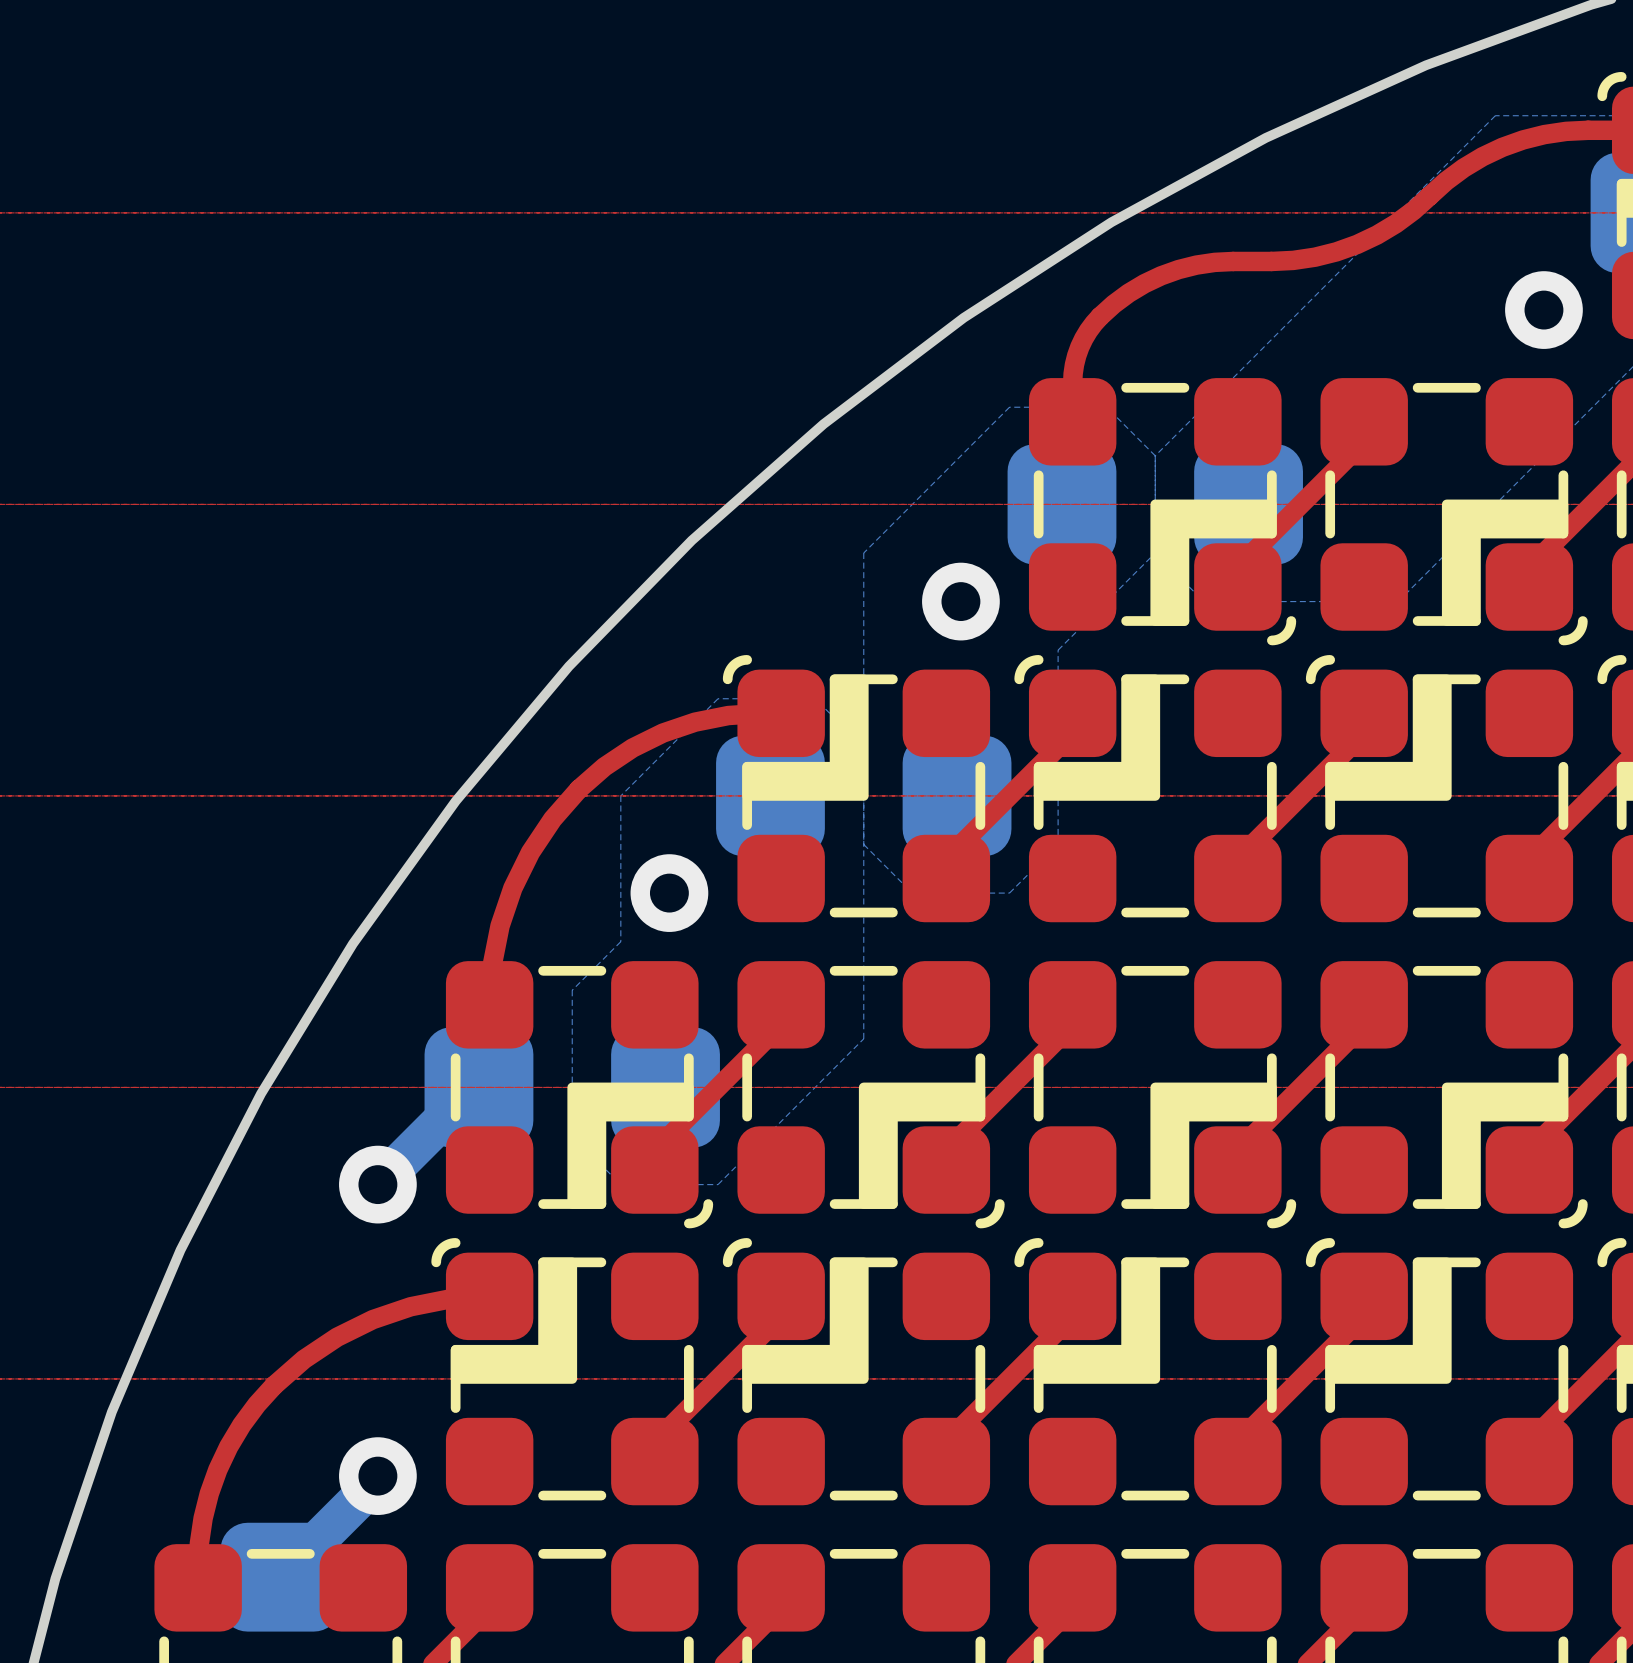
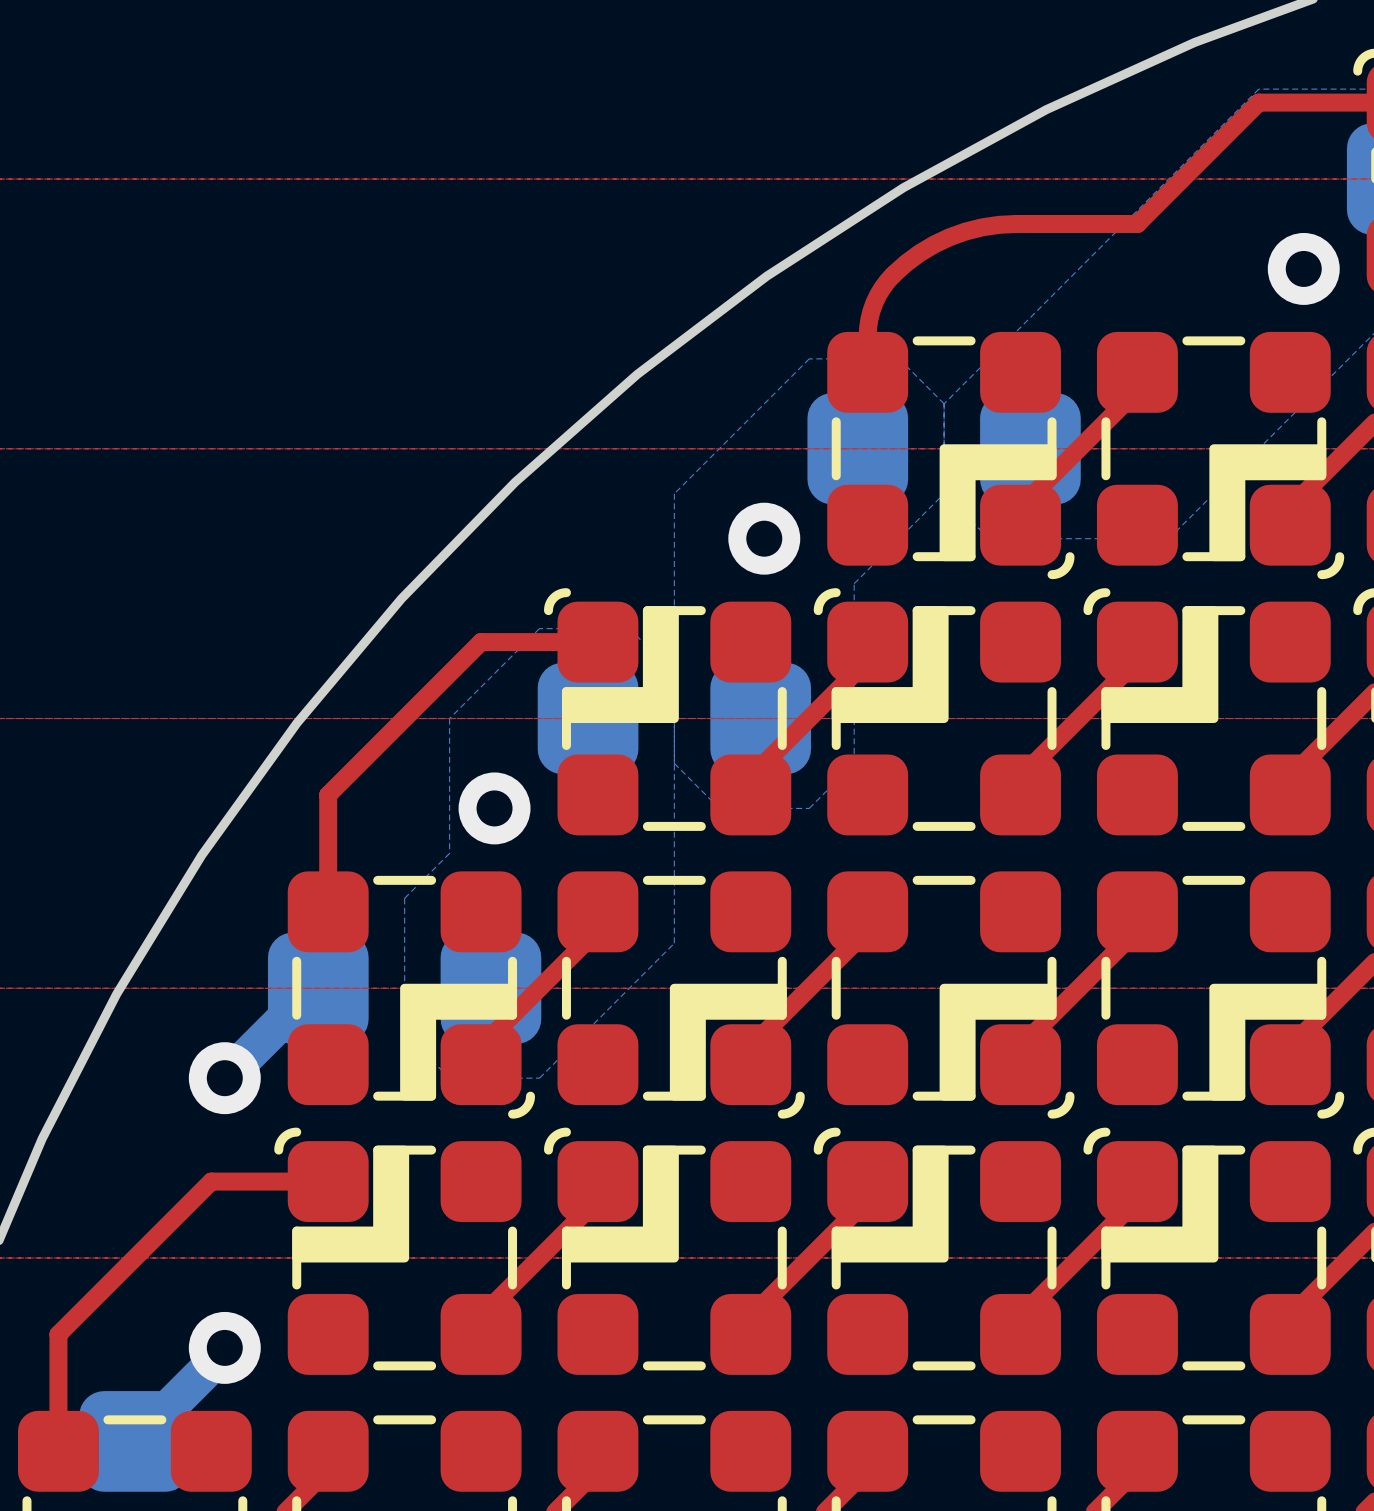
top track: (1588, 130) (1544, 134) (1502, 147) (1463, 168) (1413, 210) (1377, 235) (1357, 244) (1315, 257) (1271, 261) -> (1344, 102) (1258, 102) (1137, 223) (1051, 223)
top track: (762, 713) (728, 715) (695, 722) (663, 733) (632, 748) (604, 766) (578, 789) (552, 819) (530, 852) (512, 888) (500, 925) (492, 965) (489, 1004) -> (597, 642) (481, 642) (328, 794) (328, 911)
top track: (489, 1296) (449, 1298) (410, 1306) (372, 1319) (337, 1337) (303, 1359) (273, 1385) (241, 1424) (217, 1469) (203, 1518) (198, 1568) -> (328, 1181) (211, 1181) (58, 1334) (58, 1451)

